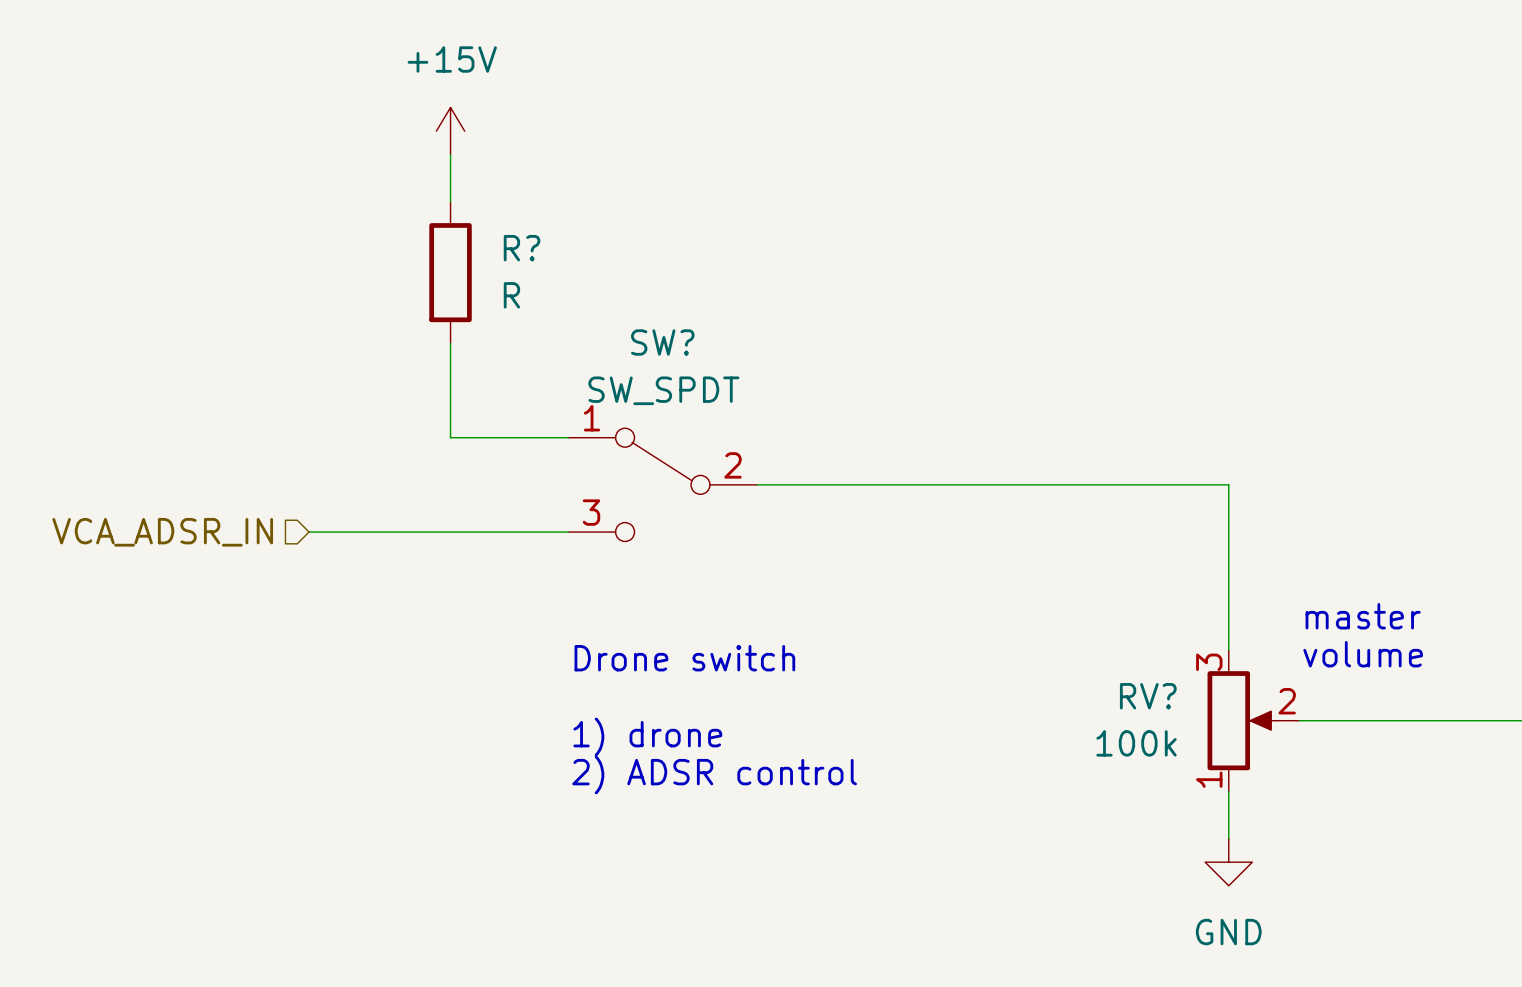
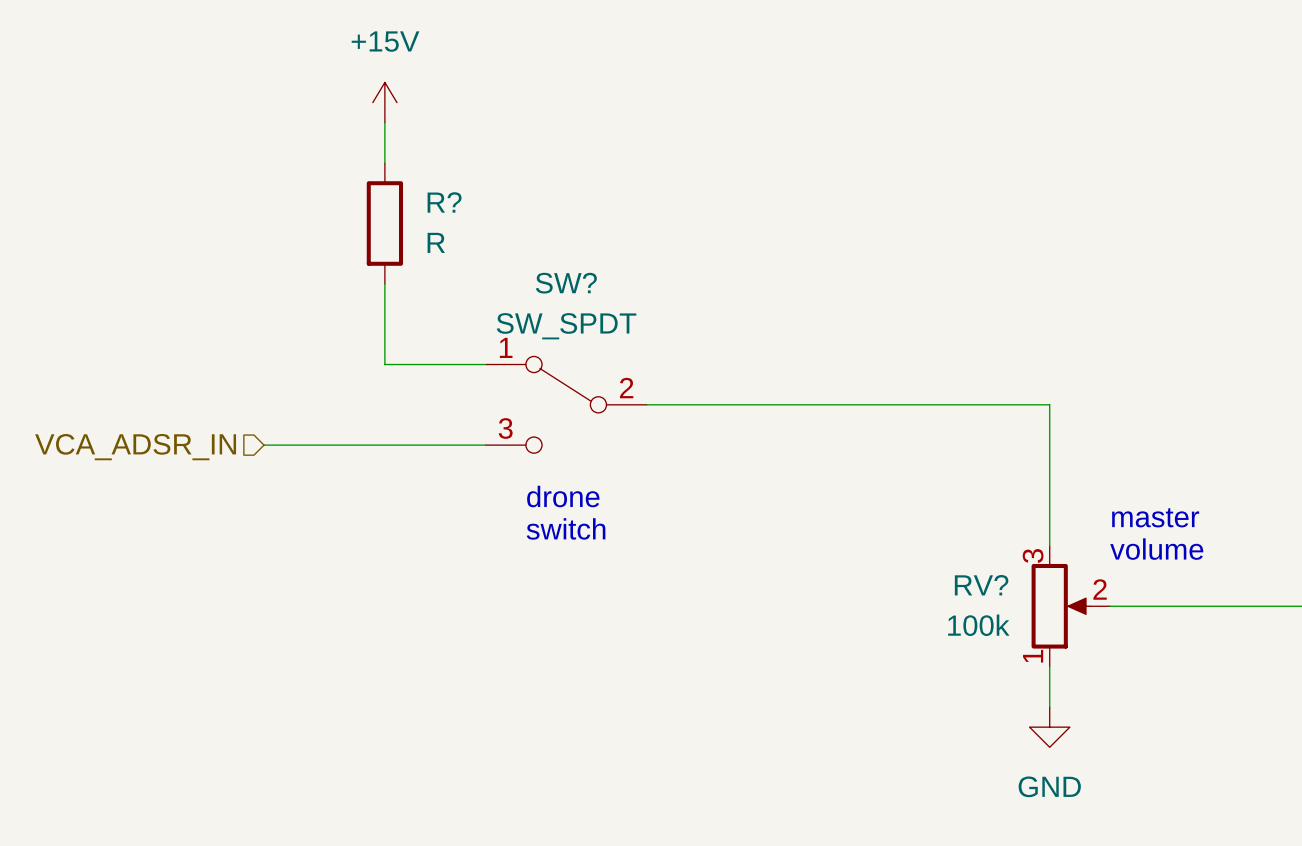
text: none -> drone (563, 496)
text: Drone switch (684, 658) -> switch (566, 528)
text: 1) drone (647, 736) -> none
text: 2) ADSR control (714, 774) -> none

